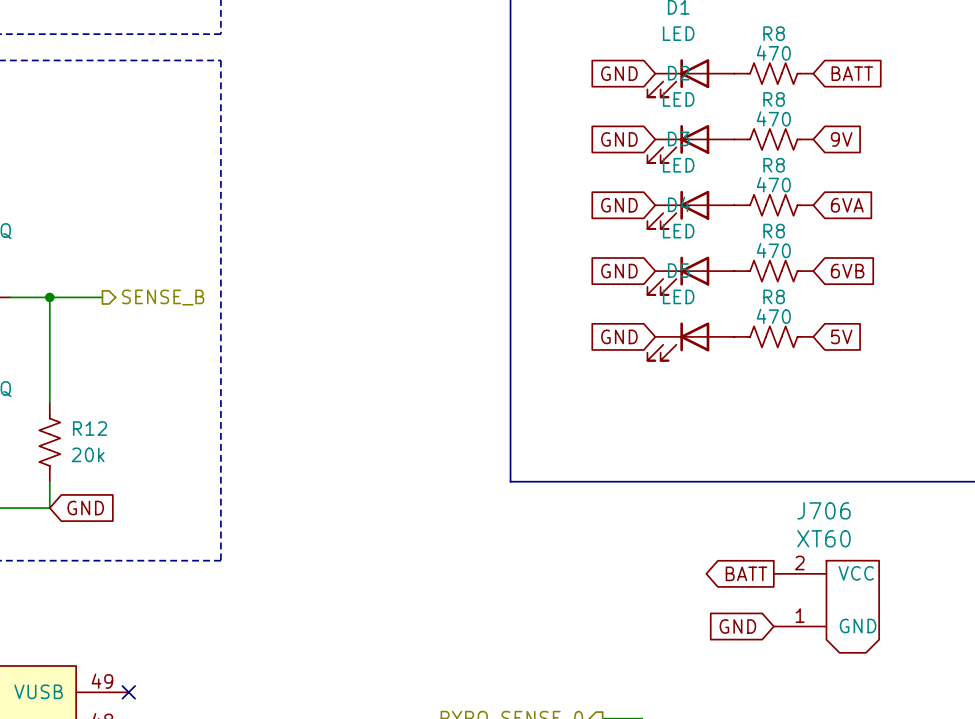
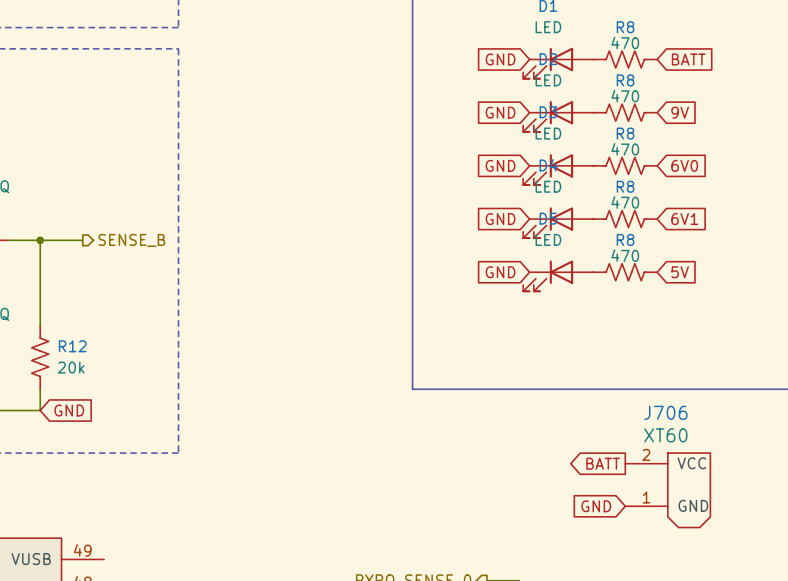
global label: 6VA (847, 205) -> 6V0 (684, 165)
global label: 6VB (847, 271) -> 6V1 (684, 219)
no-connect mark: (128, 692) -> none

